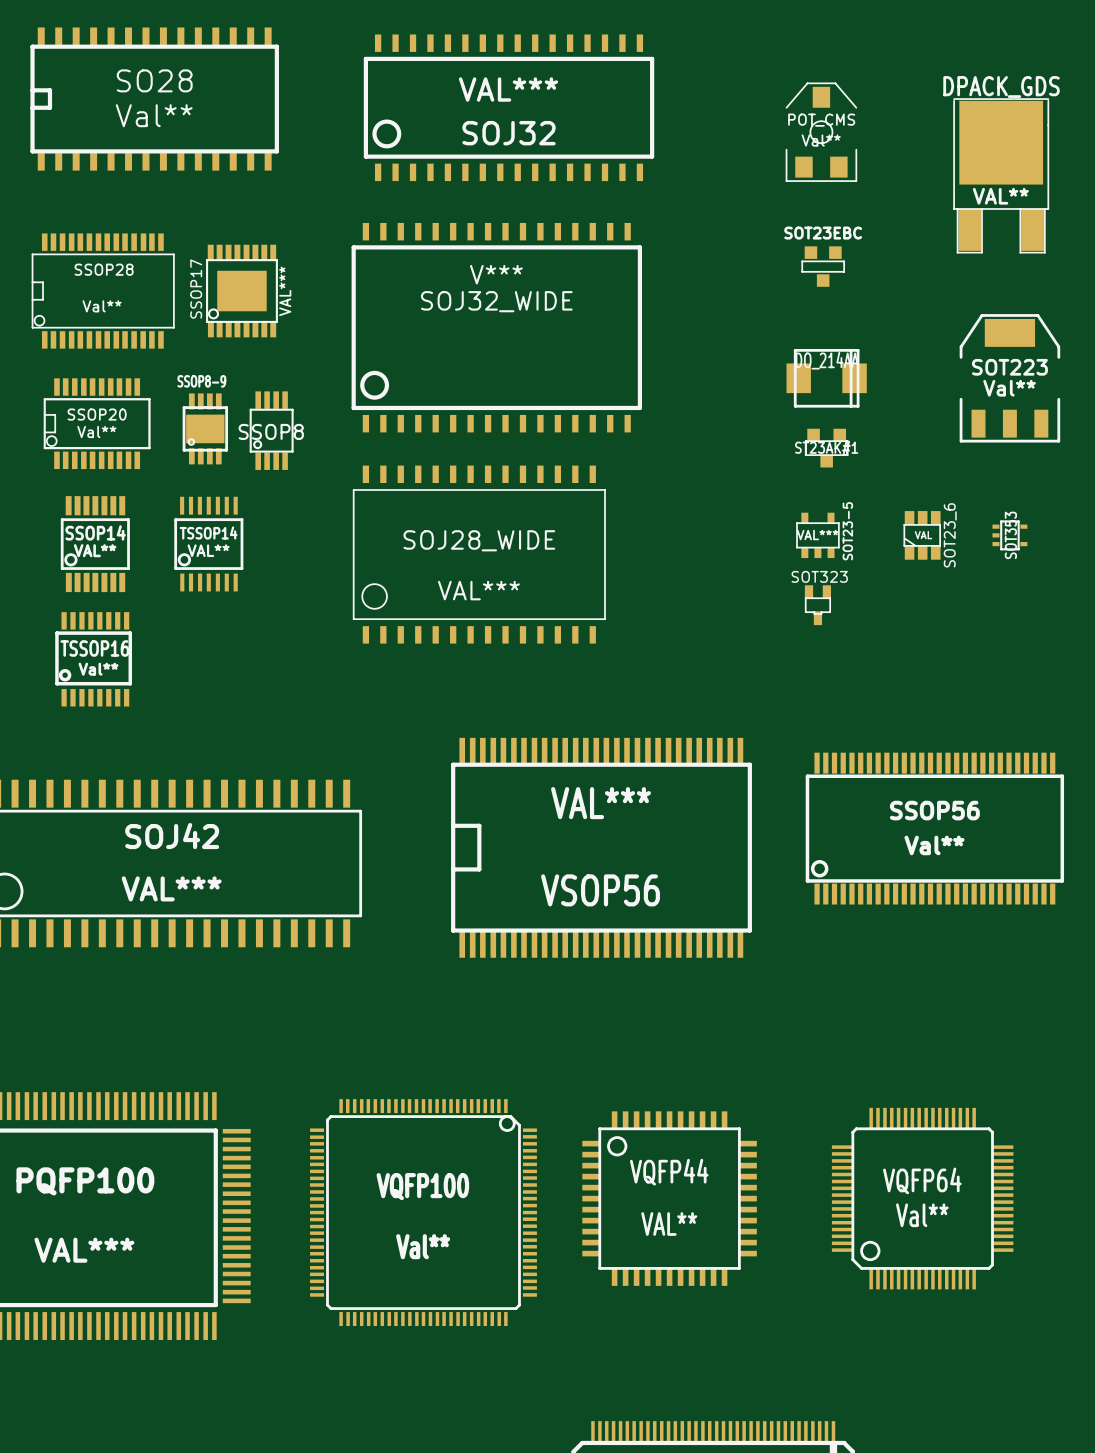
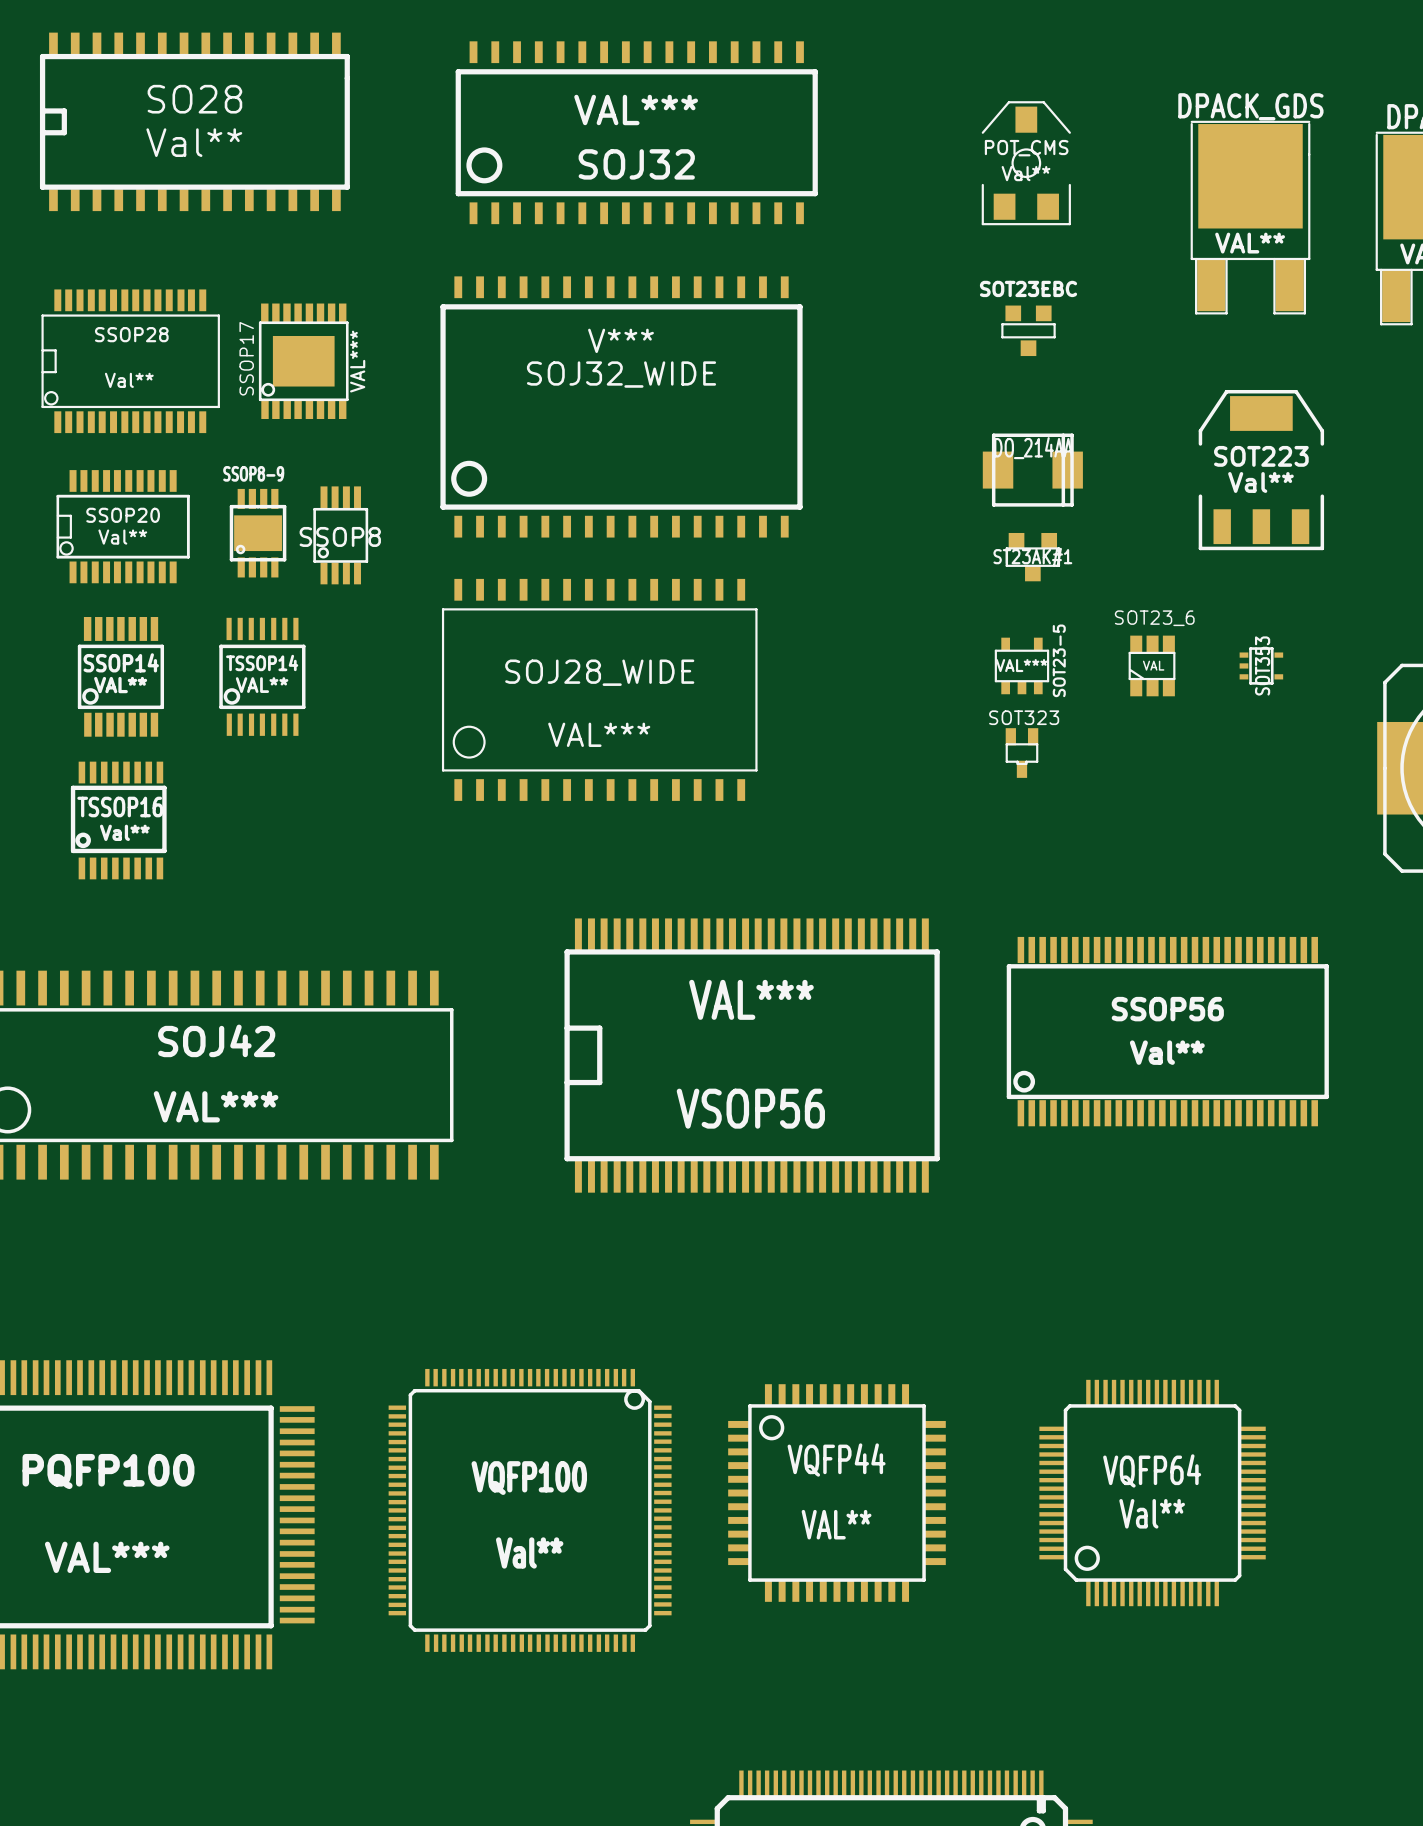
SOT23_6 name rotation: 0° (950, 535) -> 90° clockwise (1154, 618)

